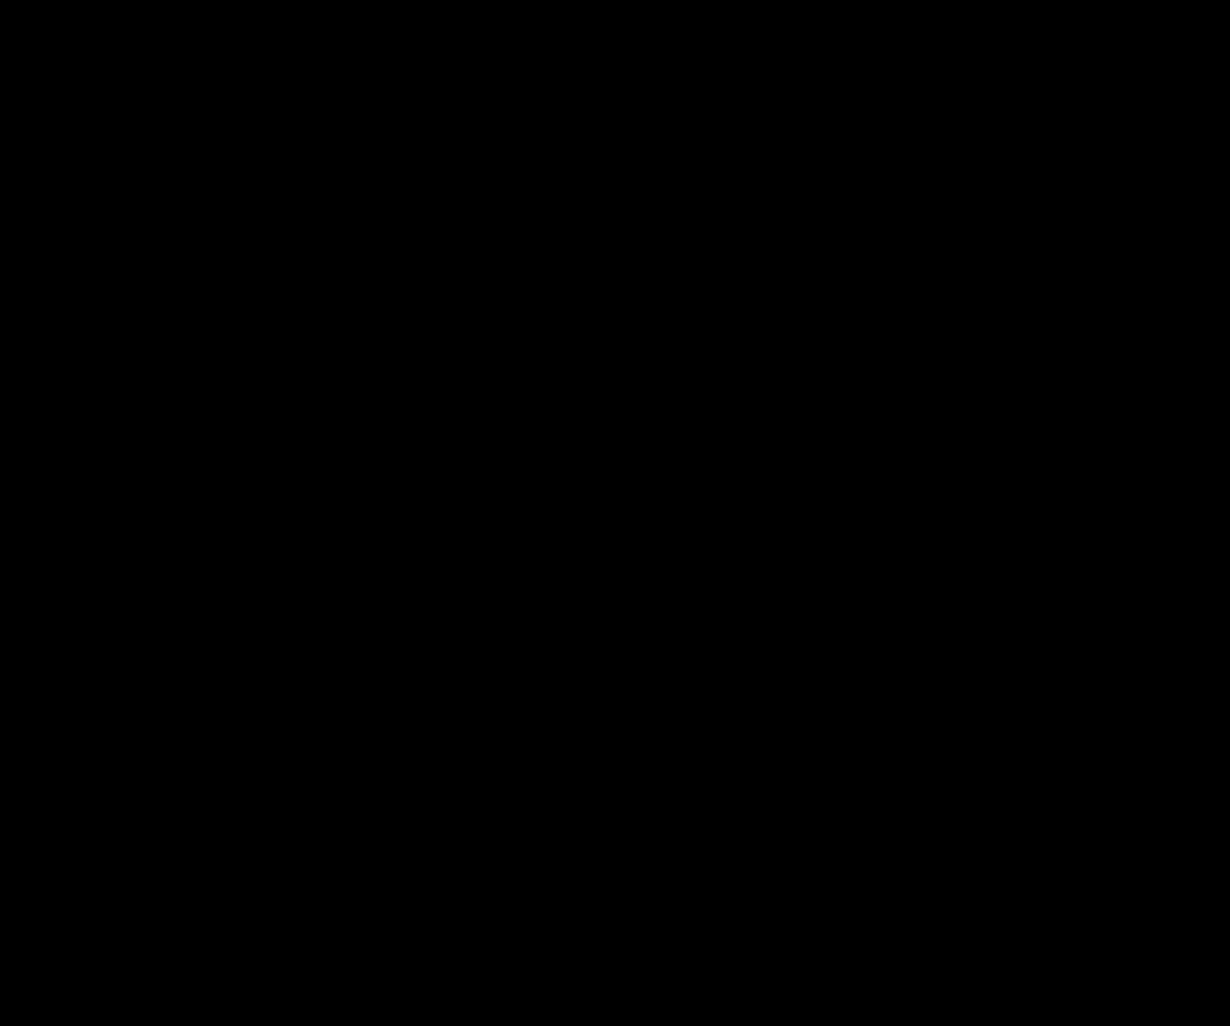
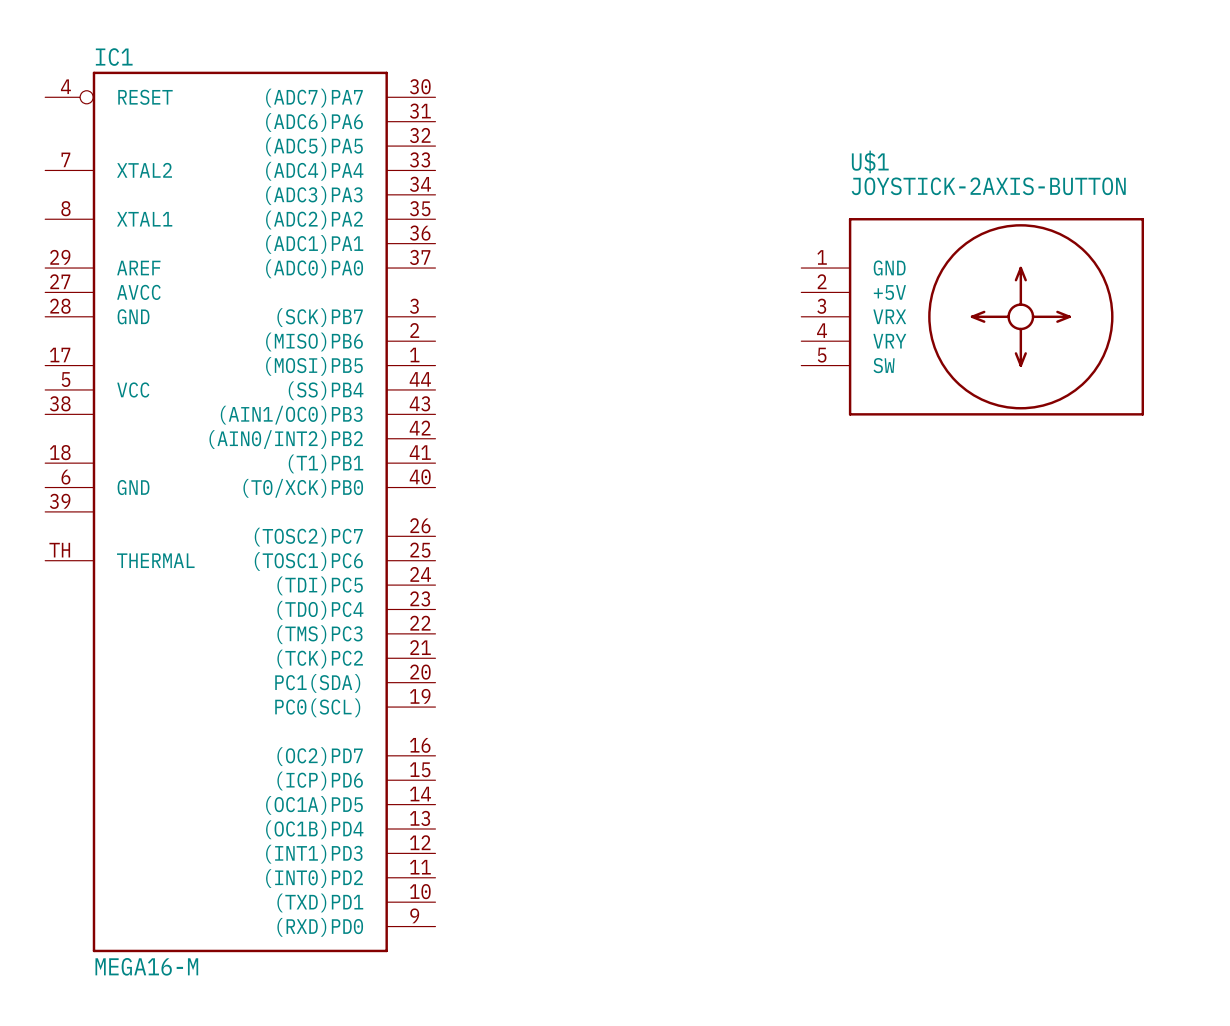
U$1: none -> JOYSTICK-2AXIS-BUTTON (972, 316)
IC1: none -> MEGA16-M (240, 511)

